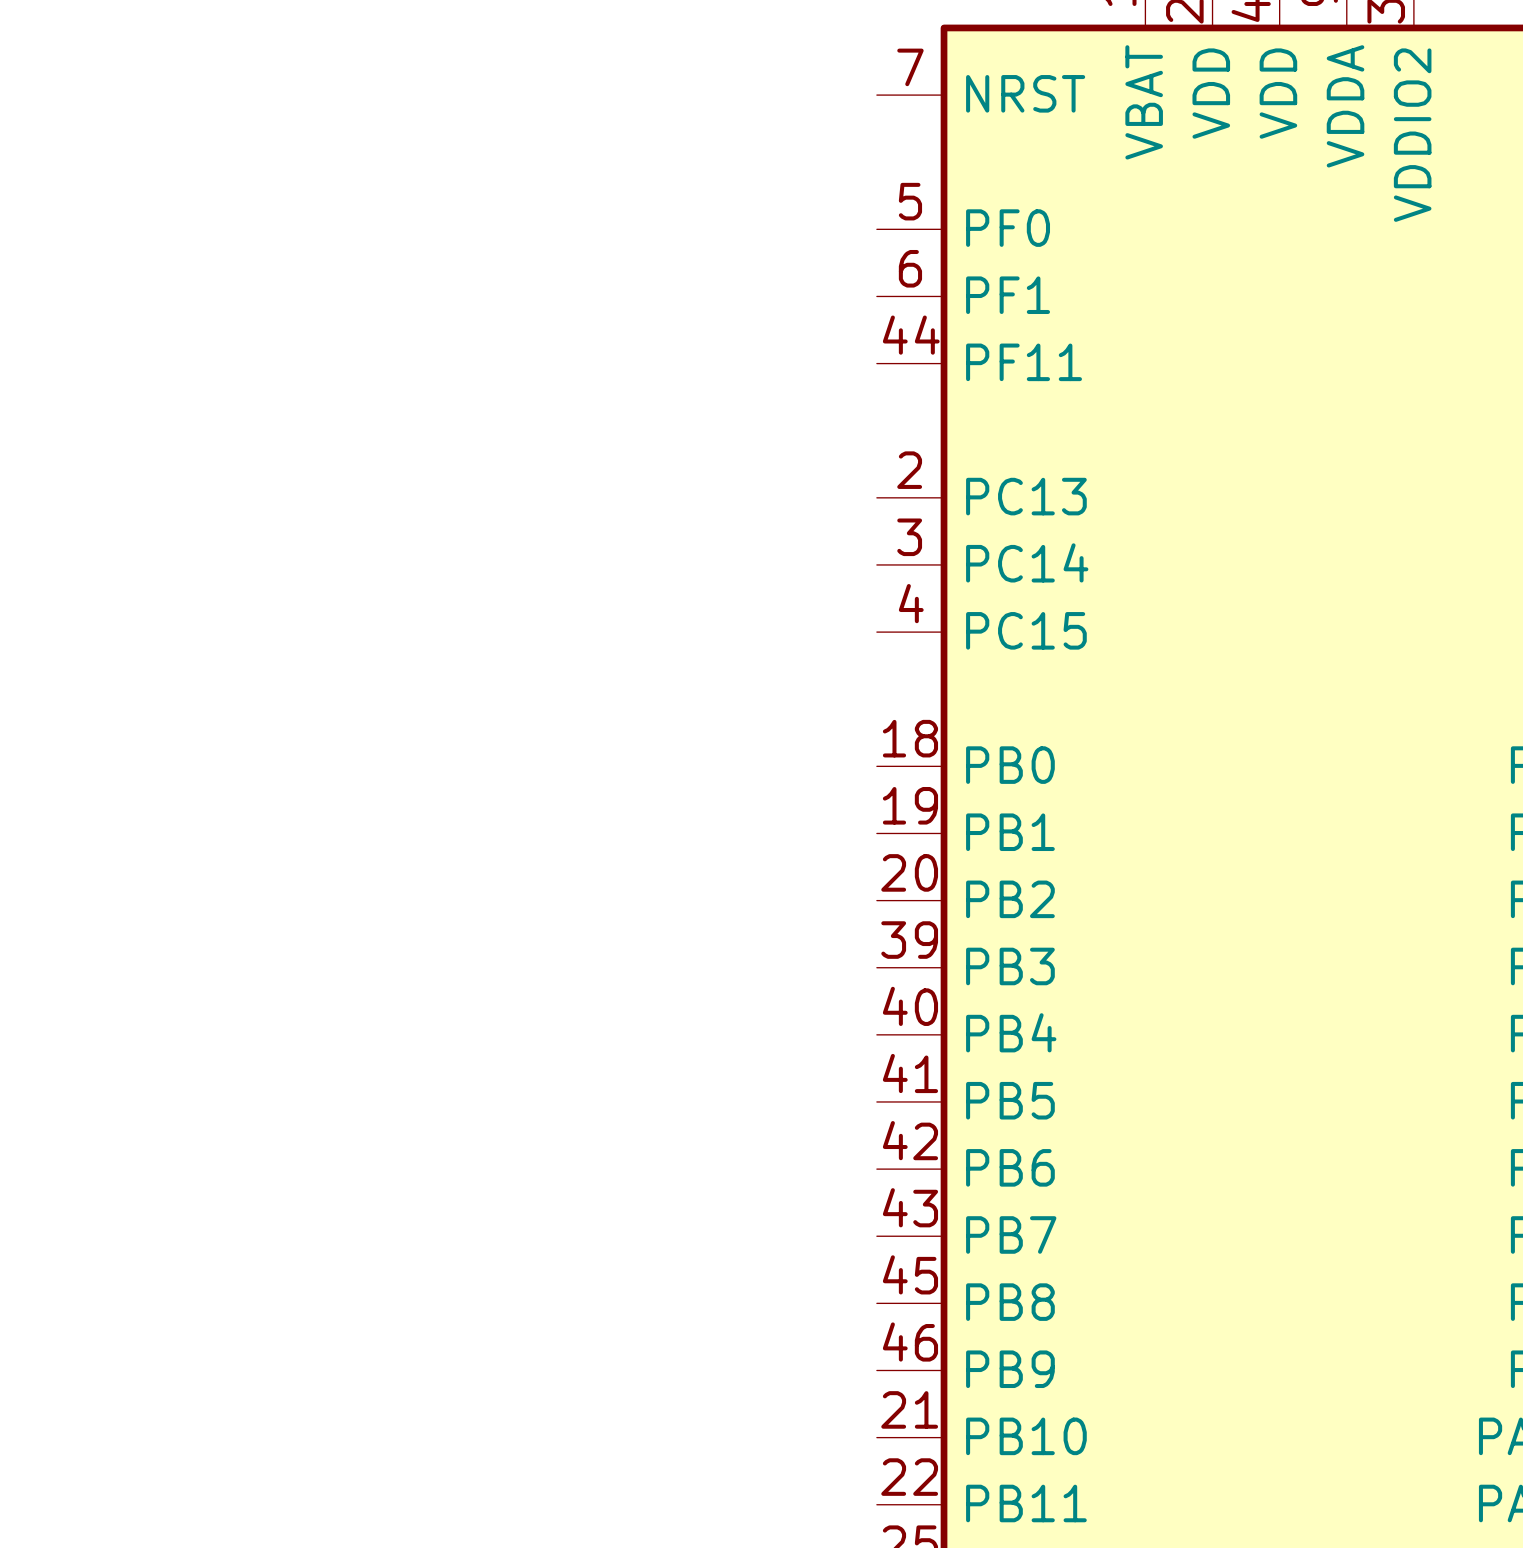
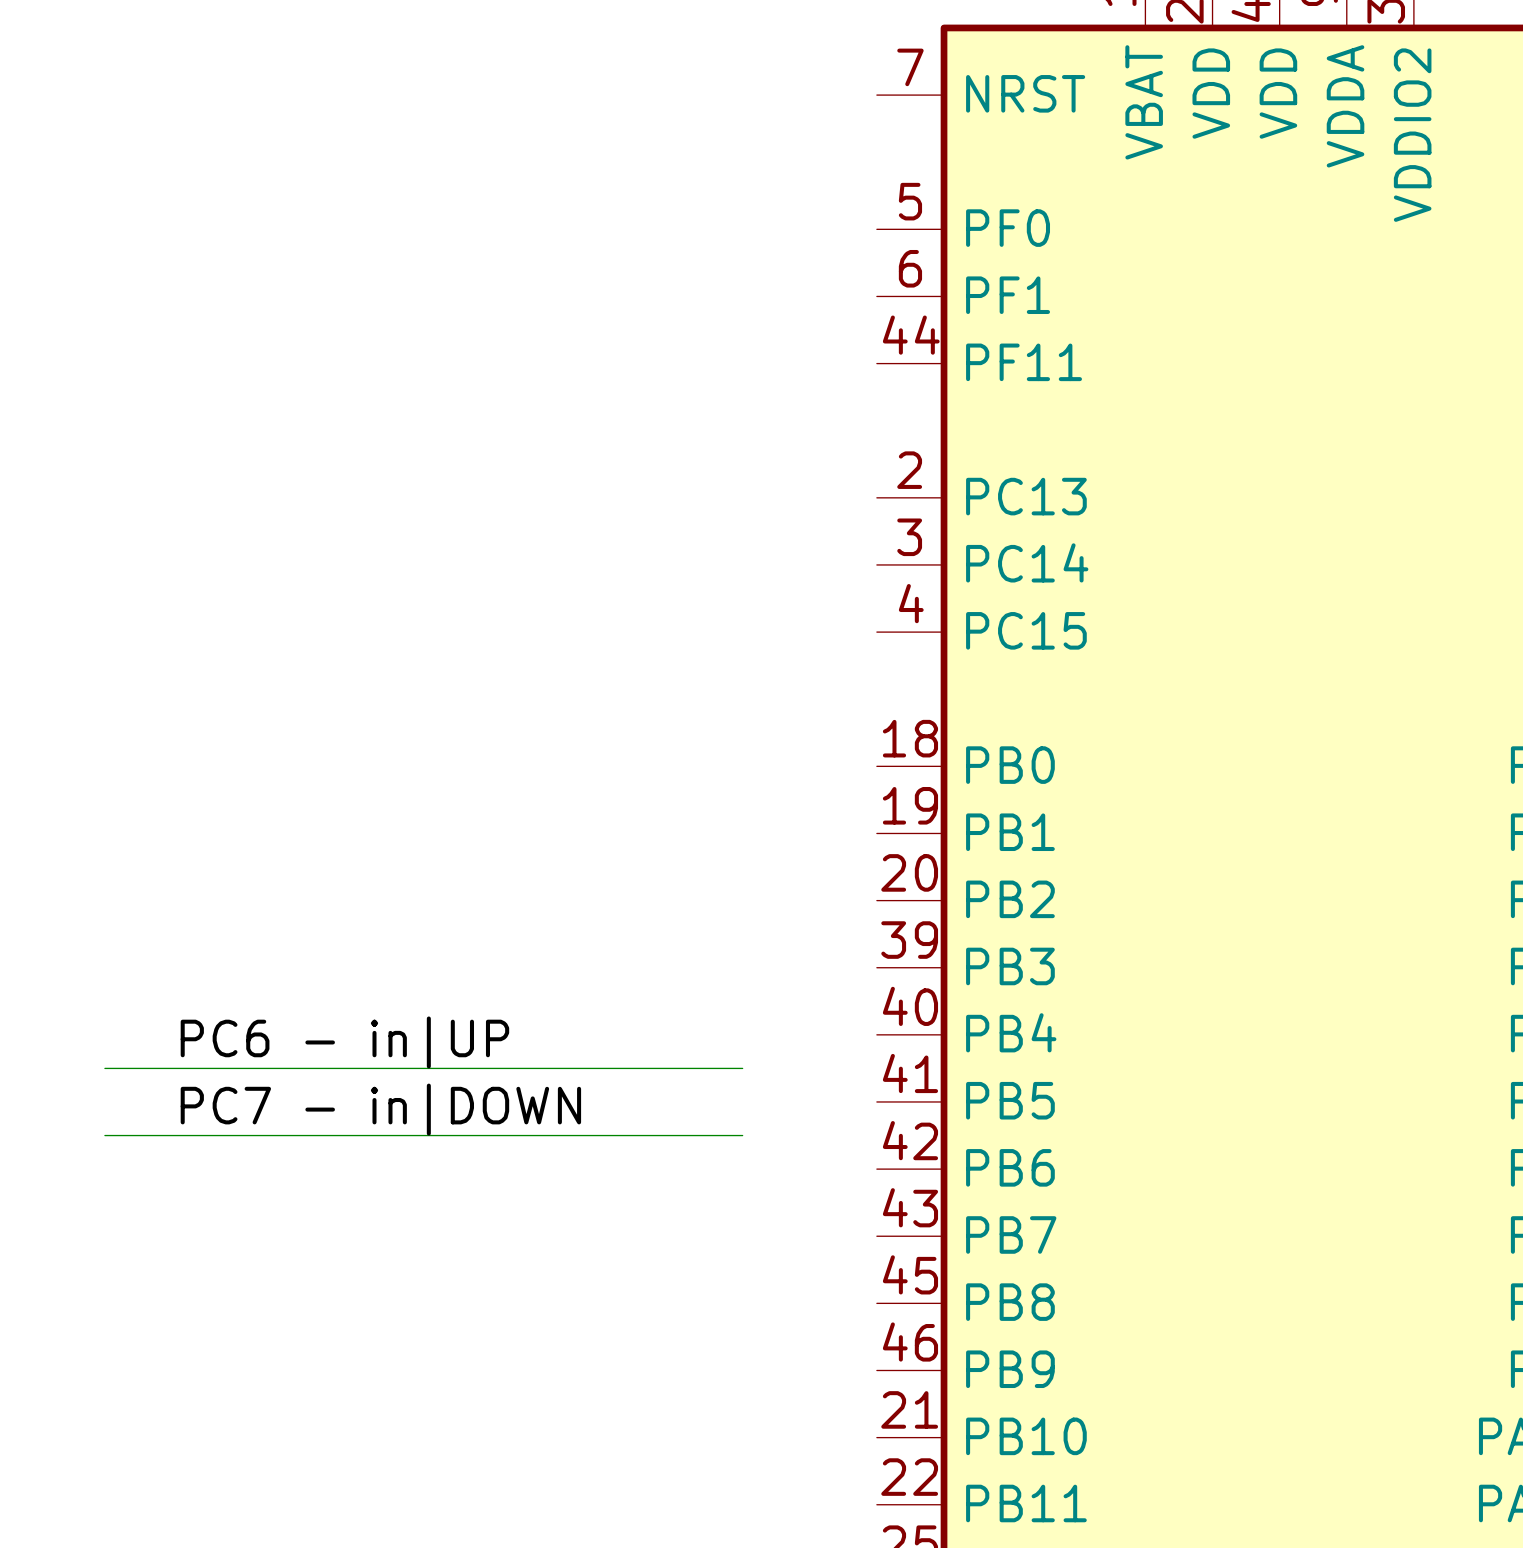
label: none -> PC6 - in|UP (344, 1042)
wire: none -> (104, 1068) (742, 1068)
label: none -> PC7 - in|DOWN (380, 1109)
wire: none -> (104, 1135) (742, 1135)

